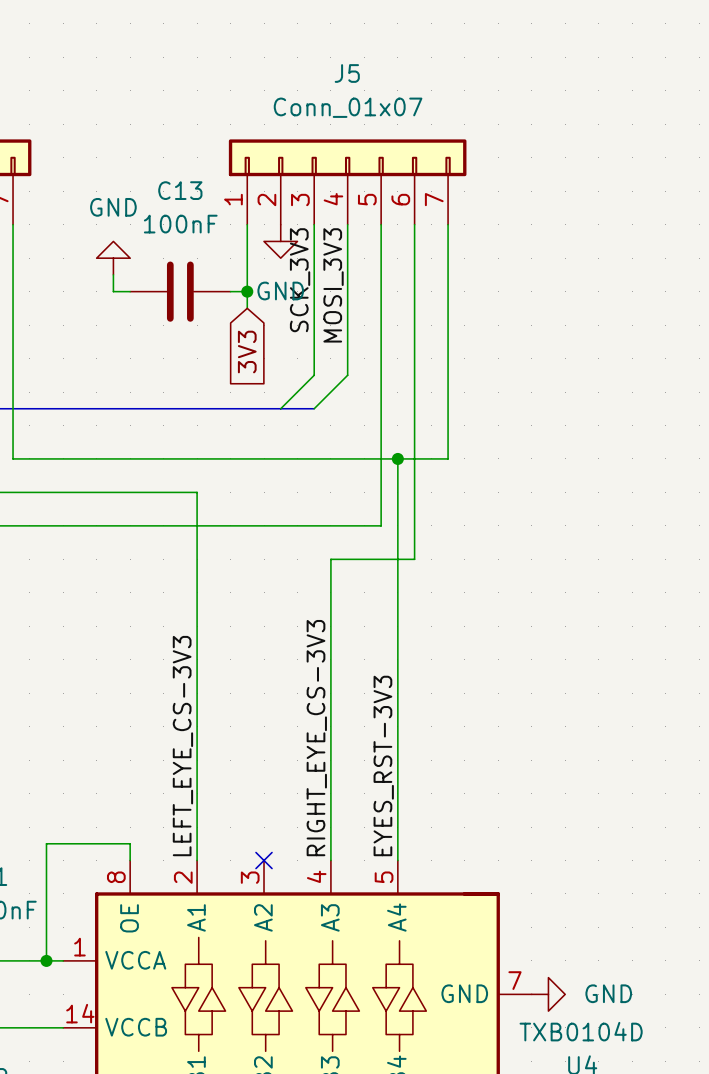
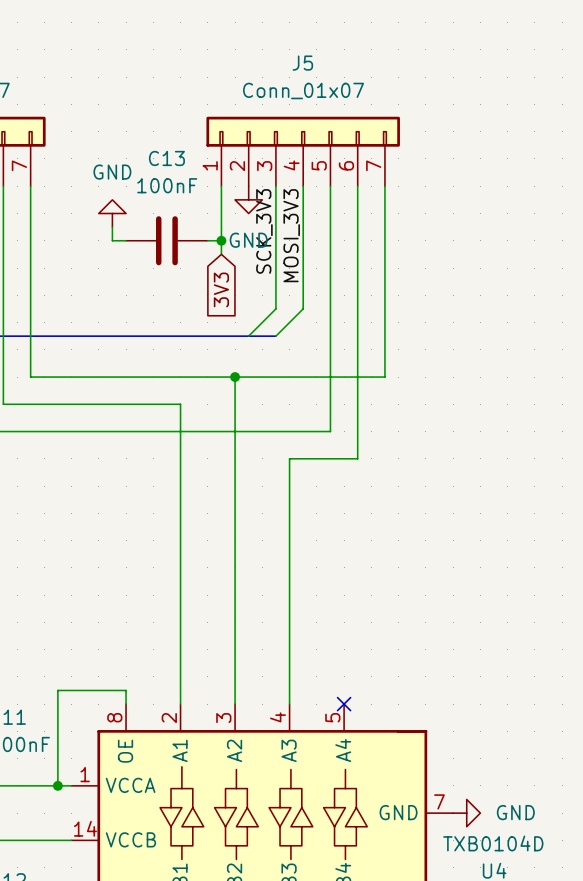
junction: none -> (235, 377)
wire: (397, 458) (397, 860) -> (235, 377) (235, 704)
junction: (397, 458) -> none
label: RIGHT_EYE_CS-3V3 (316, 738) -> none
label: LEFT_EYE_CS-3V3 (182, 746) -> none
label: EYES_RST-3V3 (383, 765) -> none
no-connect mark: (264, 860) -> none
no-connect mark: none -> (344, 704)

